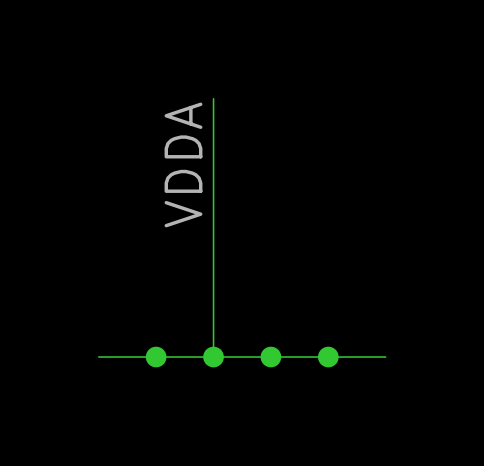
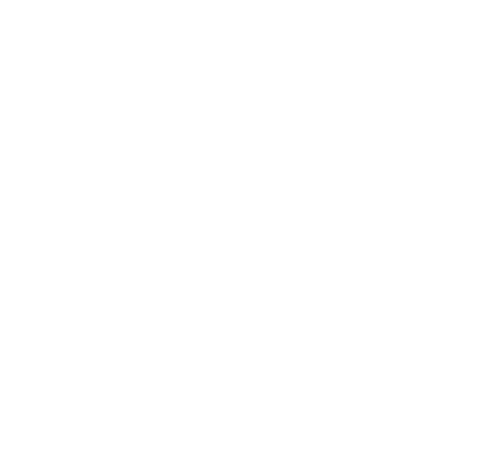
wire: (213, 98) (213, 357) -> none
label: VDDA (183, 164) -> none
wire: (98, 357) (385, 357) -> none
junction: (156, 357) -> none
junction: (213, 357) -> none
junction: (270, 357) -> none
junction: (328, 357) -> none

